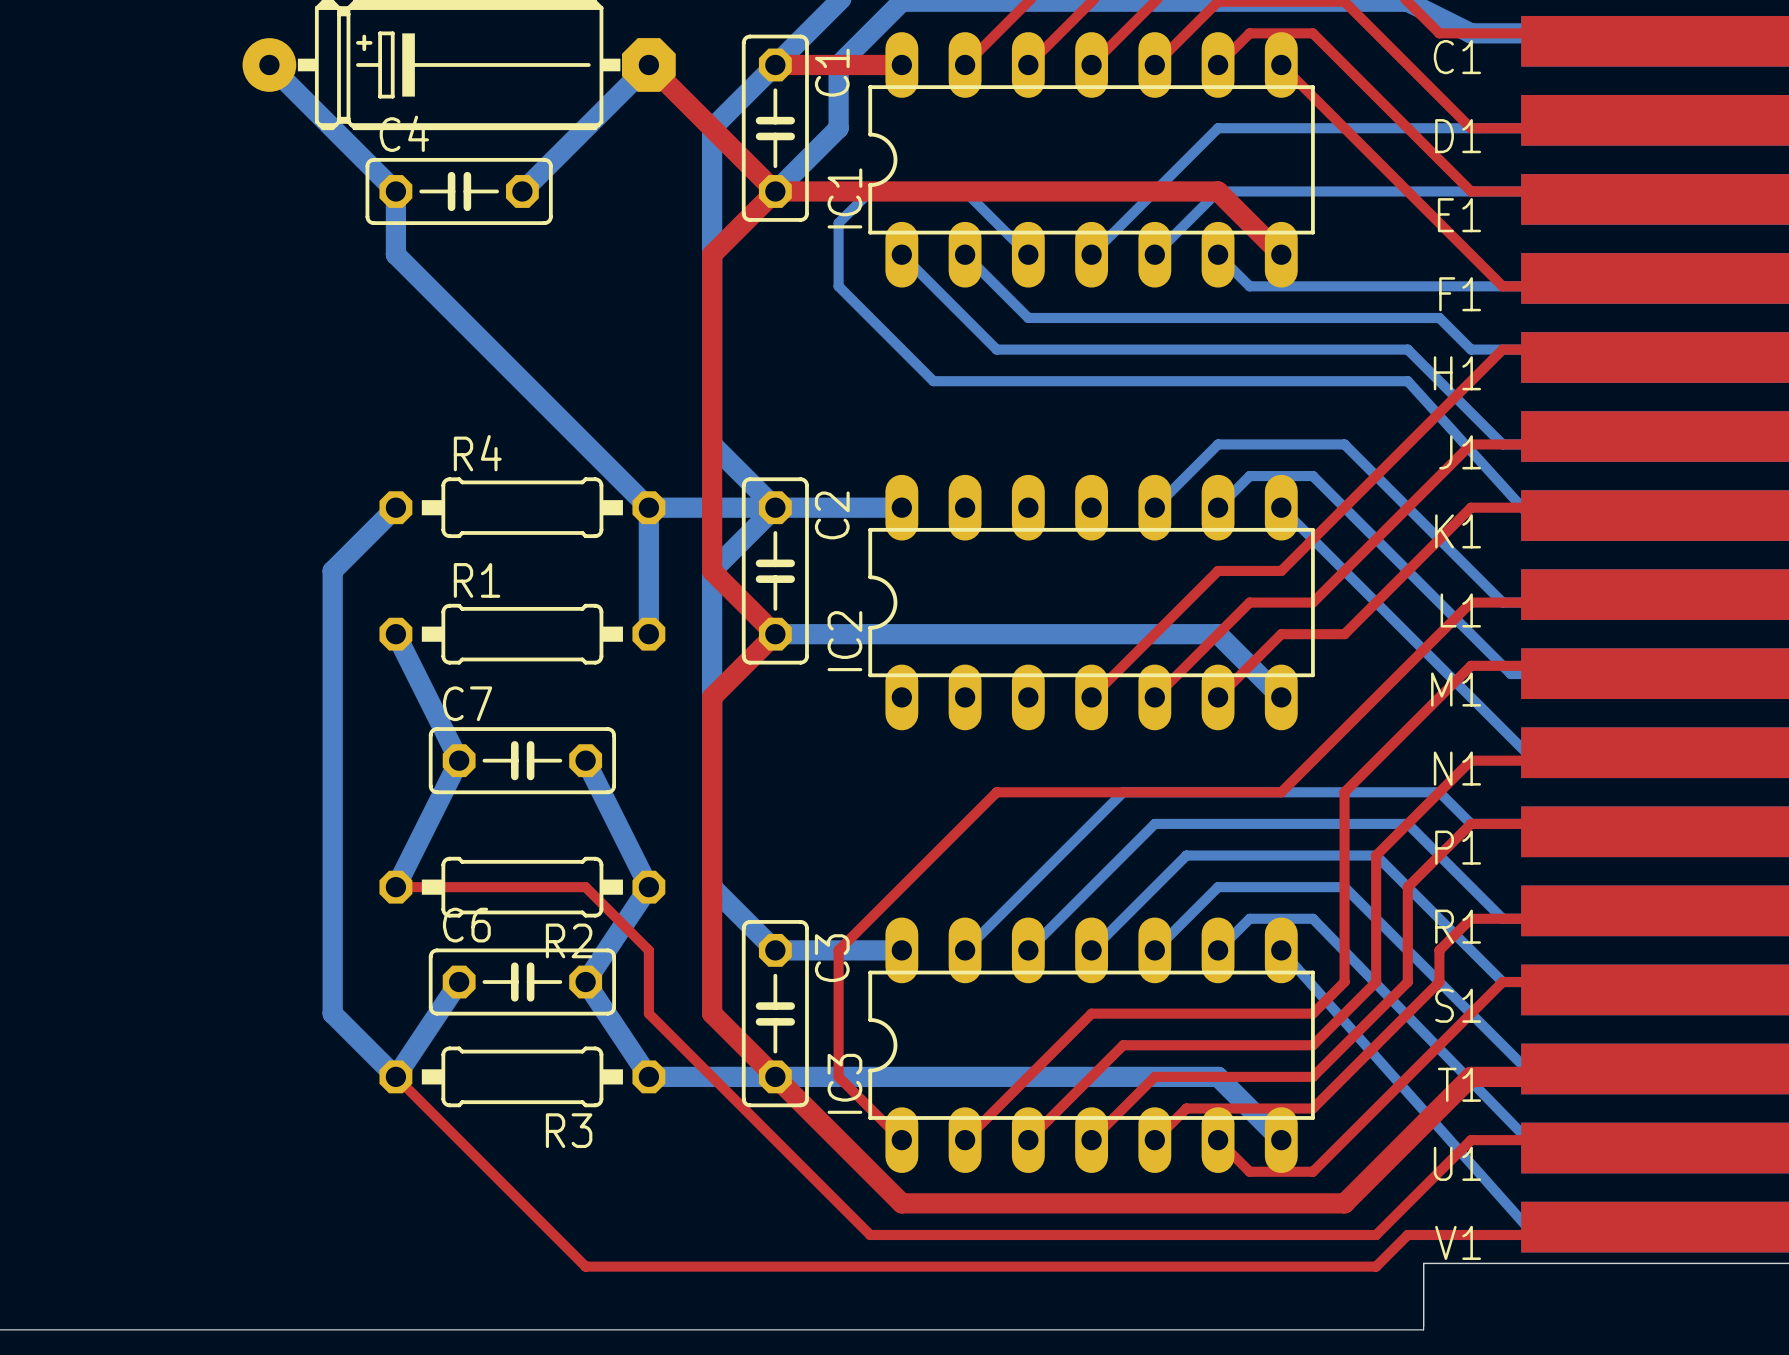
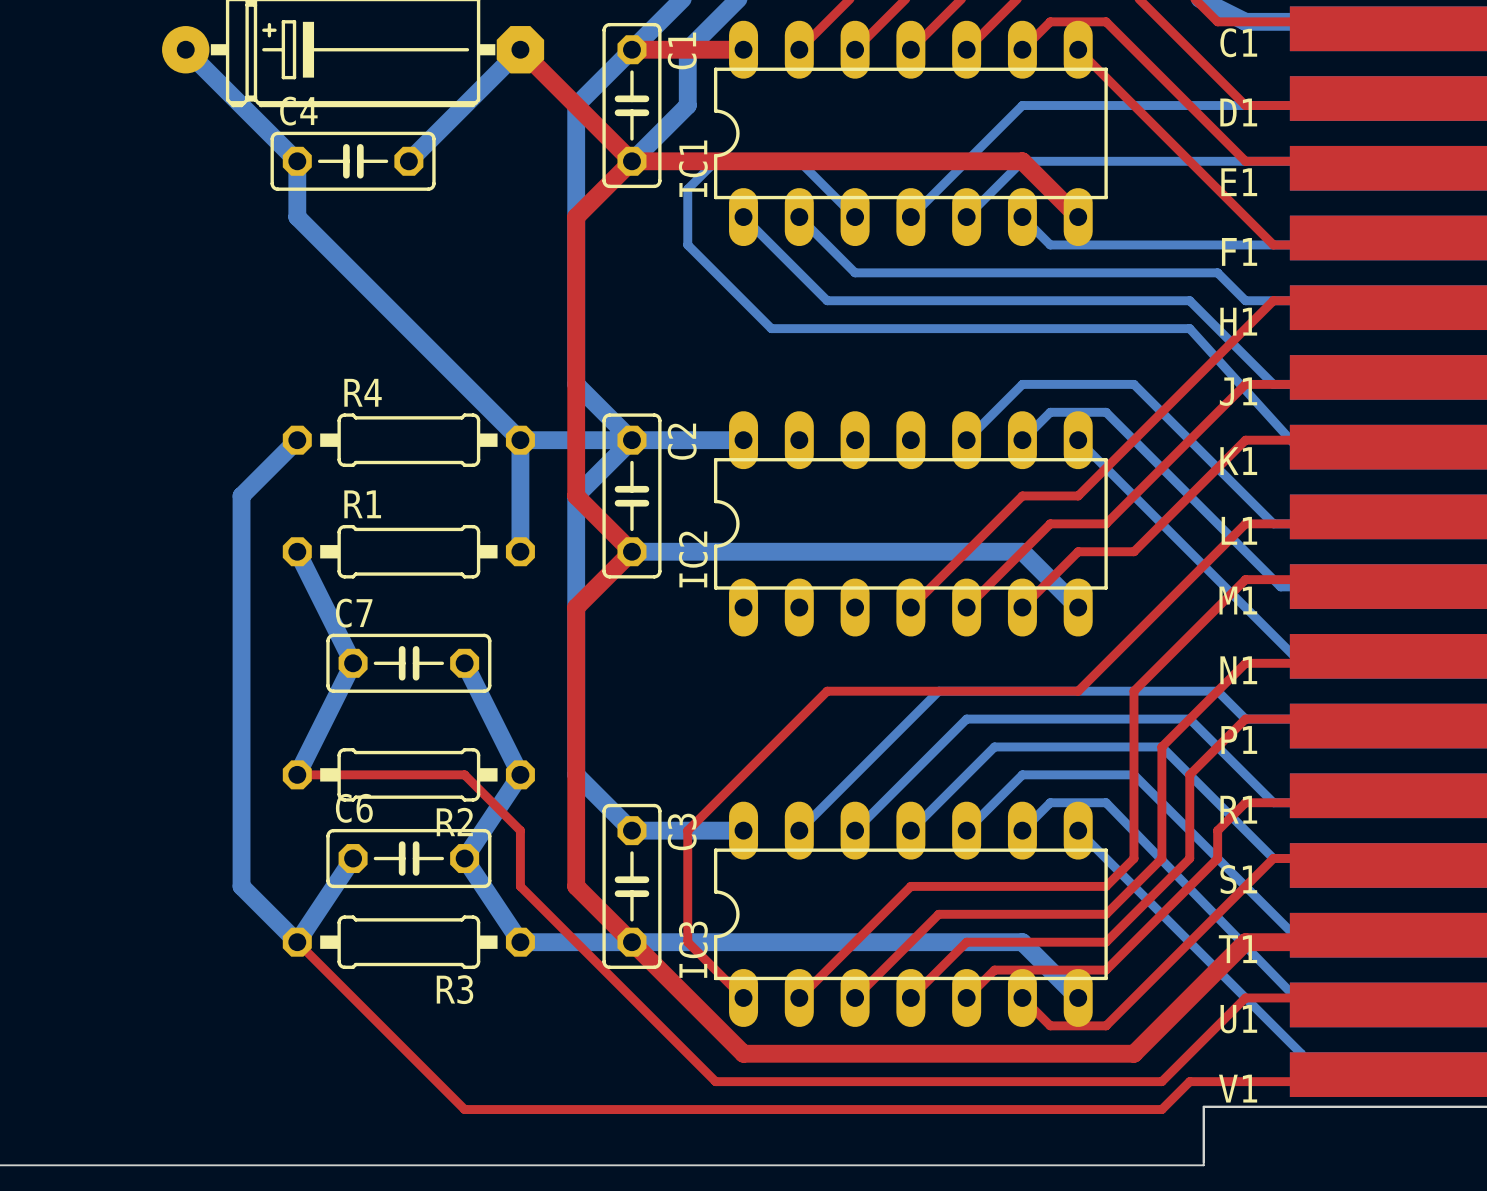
bottom track: (1281, 950) (1534, 1234) -> (1078, 830) (1301, 1053) (1301, 1081)

